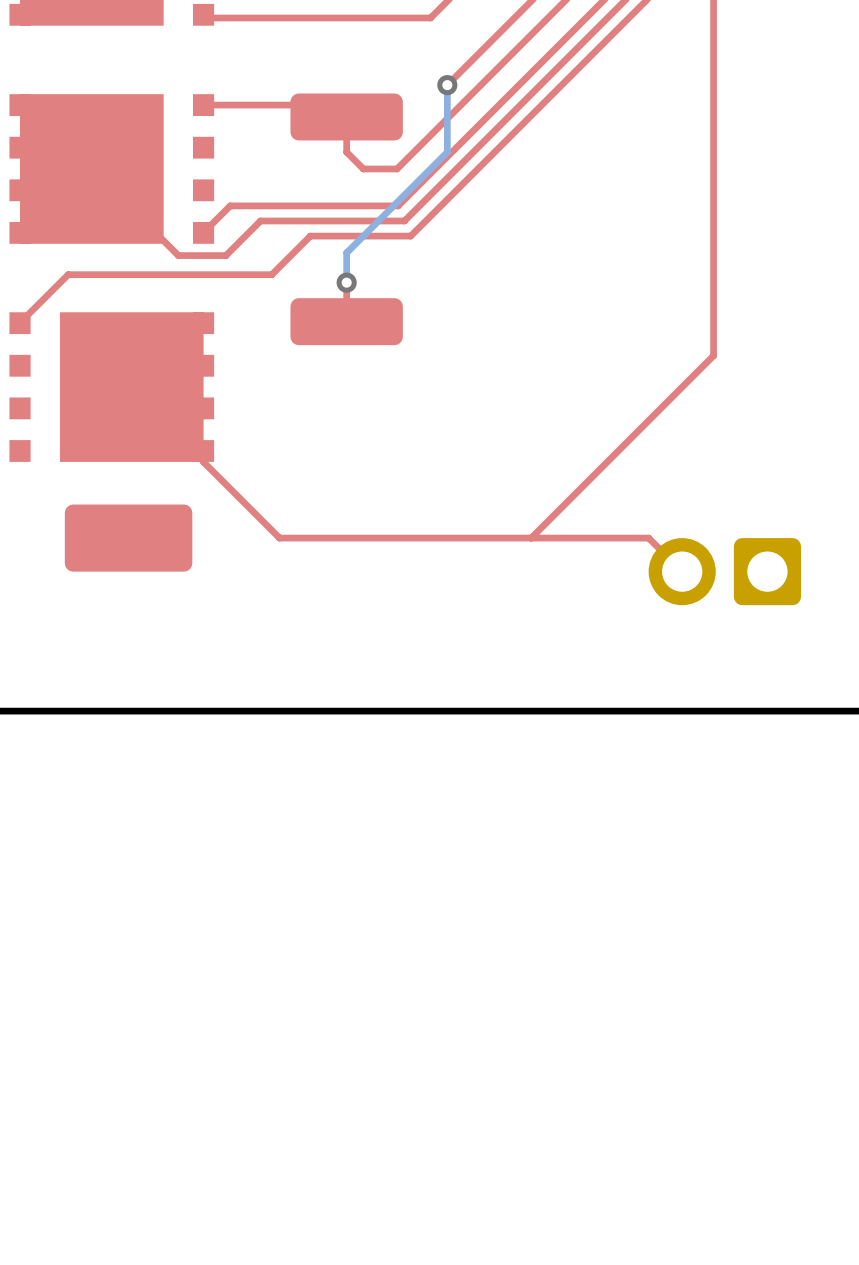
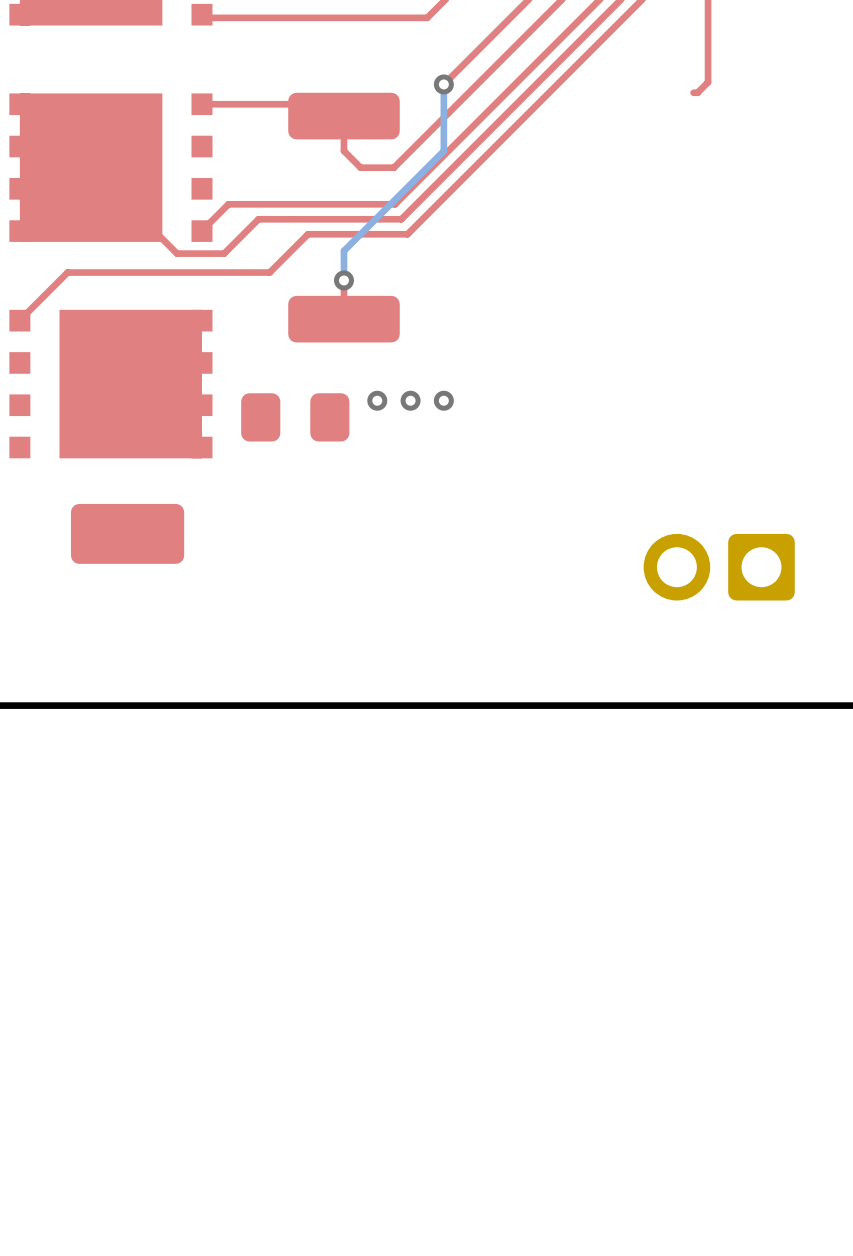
top track: (713, 82) (713, 355) (531, 538) -> (708, 82) (697, 92) (693, 92)
via: none -> (377, 400)
via: none -> (410, 400)
via: none -> (443, 400)
part: none -> (295, 417)
top track: (203, 451) (203, 462) (279, 538) (648, 538) (682, 571) -> none
part footprint: [64, 504, 193, 572] -> [70, 503, 185, 564]

